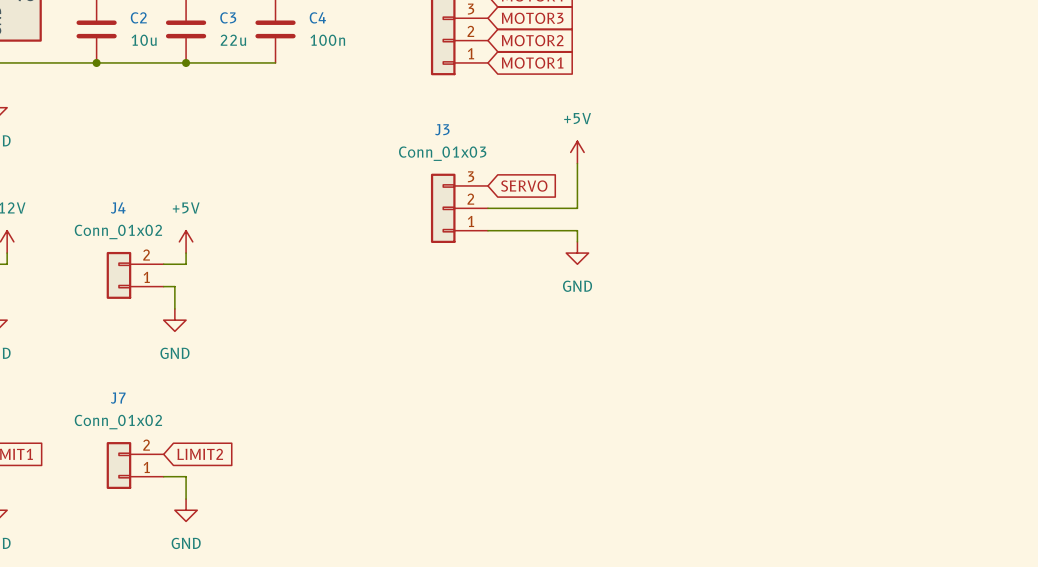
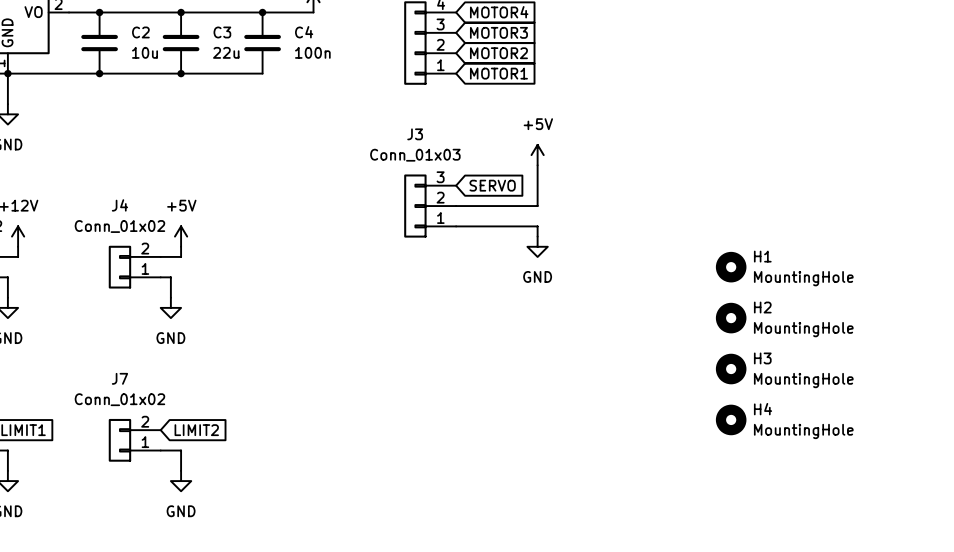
H1: none -> MountingHole (731, 267)
H2: none -> MountingHole (731, 318)
H3: none -> MountingHole (731, 369)
H4: none -> MountingHole (731, 419)

